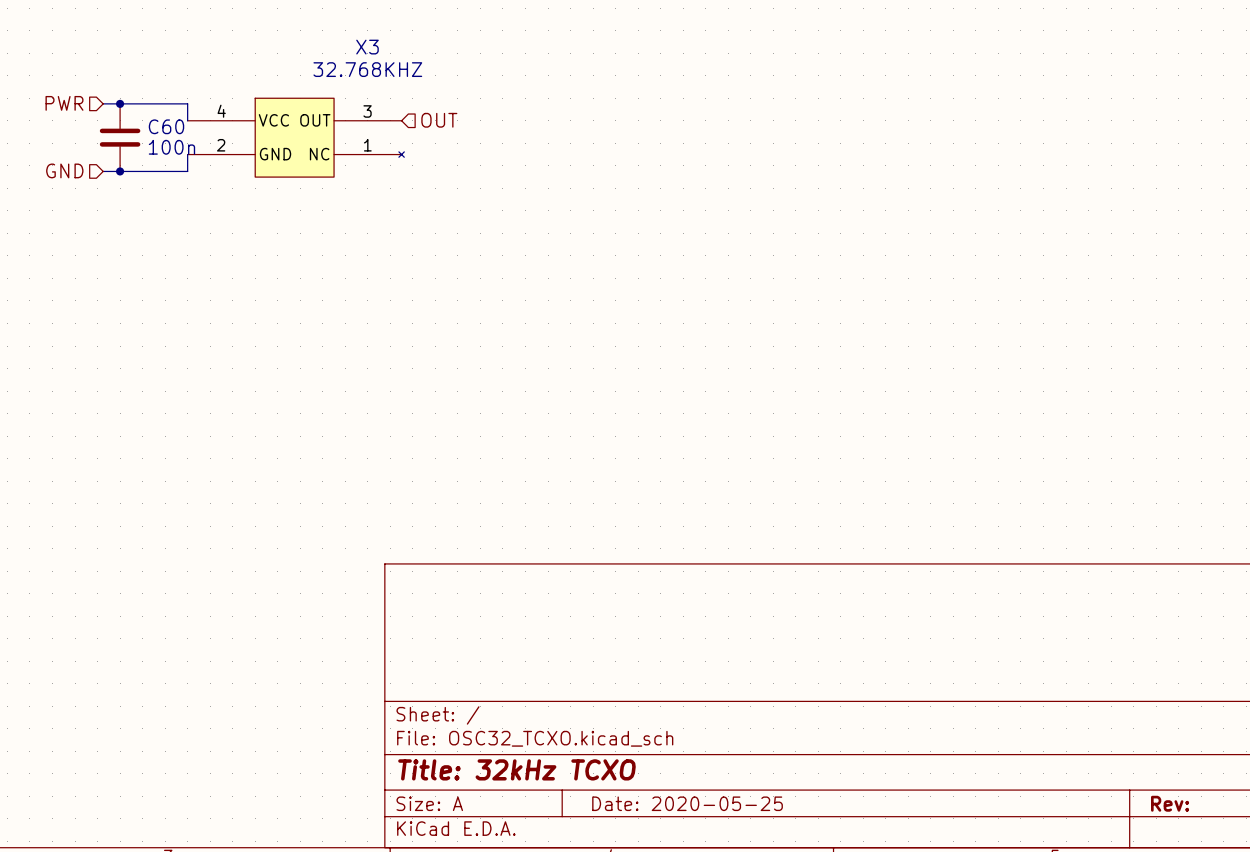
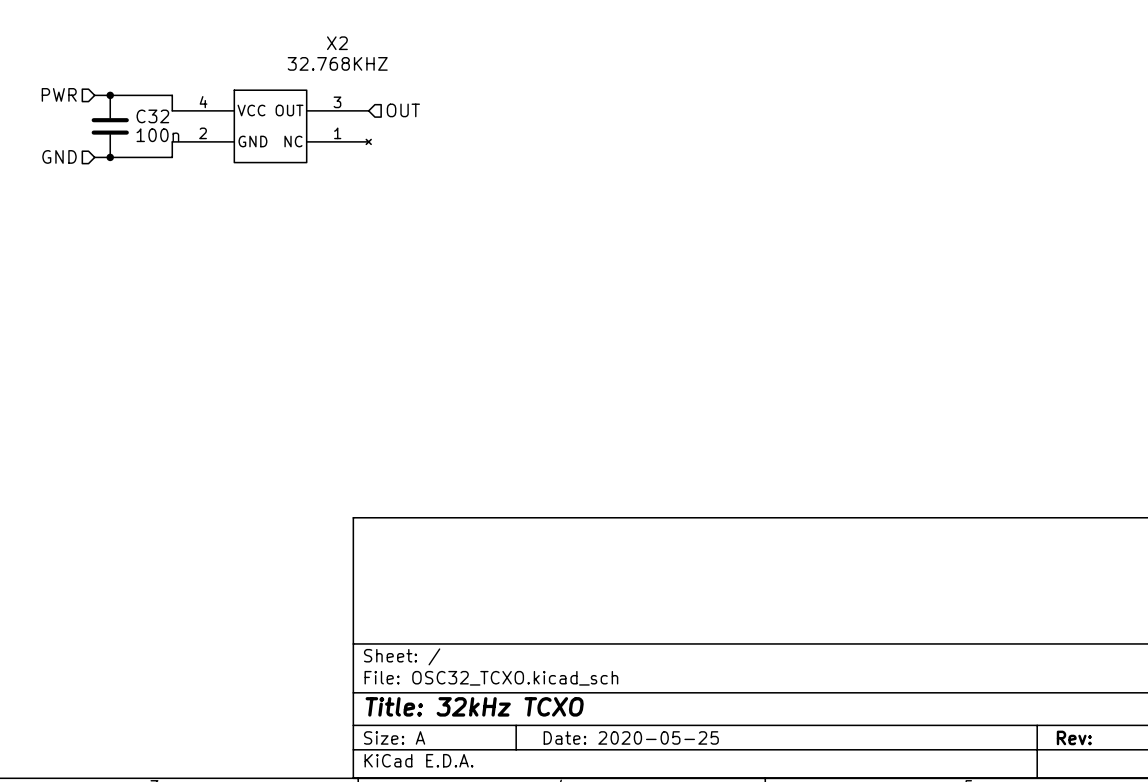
X3 name: X3 (367, 47) -> X2 (337, 43)
C60 name: C60 (166, 126) -> C32 (152, 116)

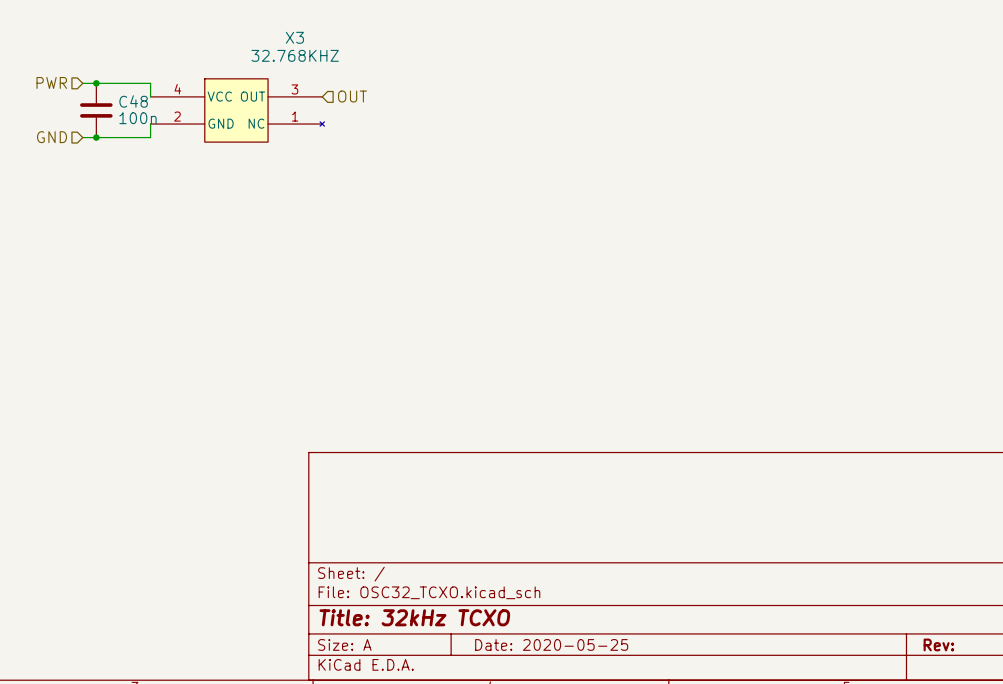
X2 name: X2 (337, 43) -> X3 (294, 37)
C32 name: C32 (152, 116) -> C48 (133, 101)

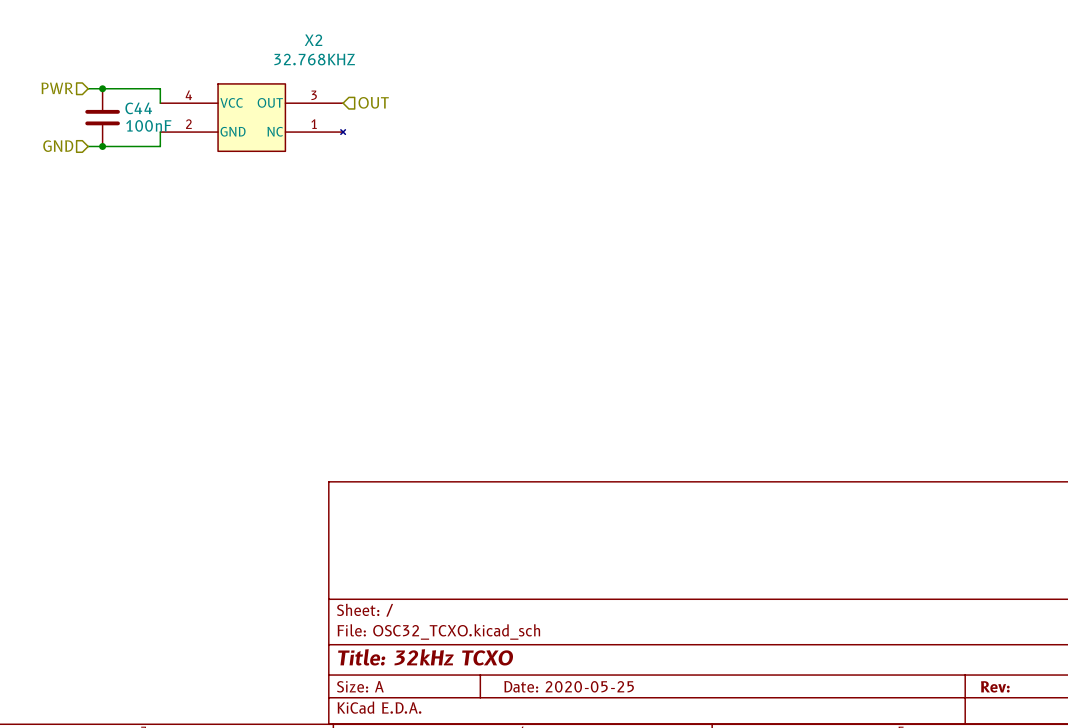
X3 name: X3 (294, 37) -> X2 (313, 40)
C48 name: C48 (133, 101) -> C44 (138, 108)
C48 value: 100n (137, 118) -> 100nF (148, 125)

